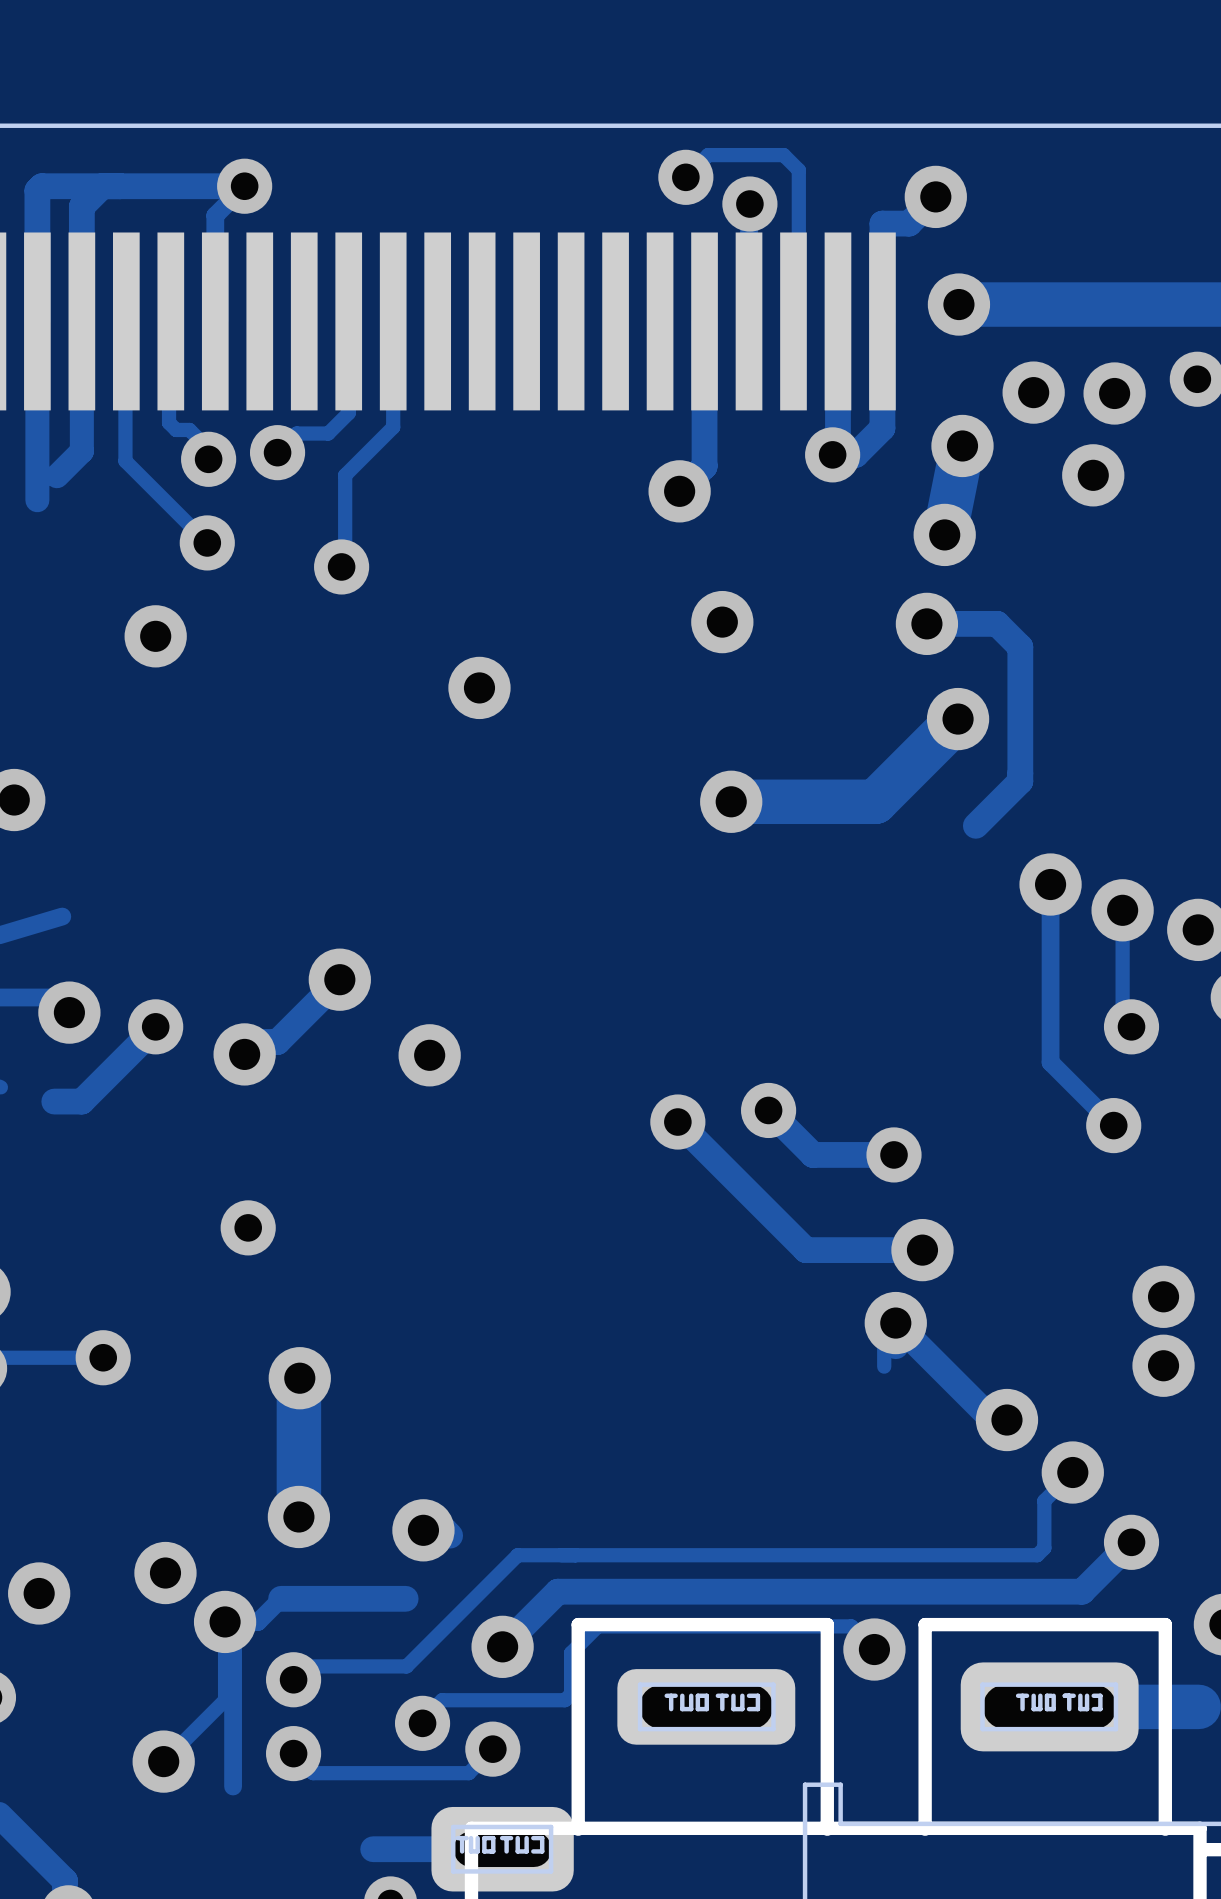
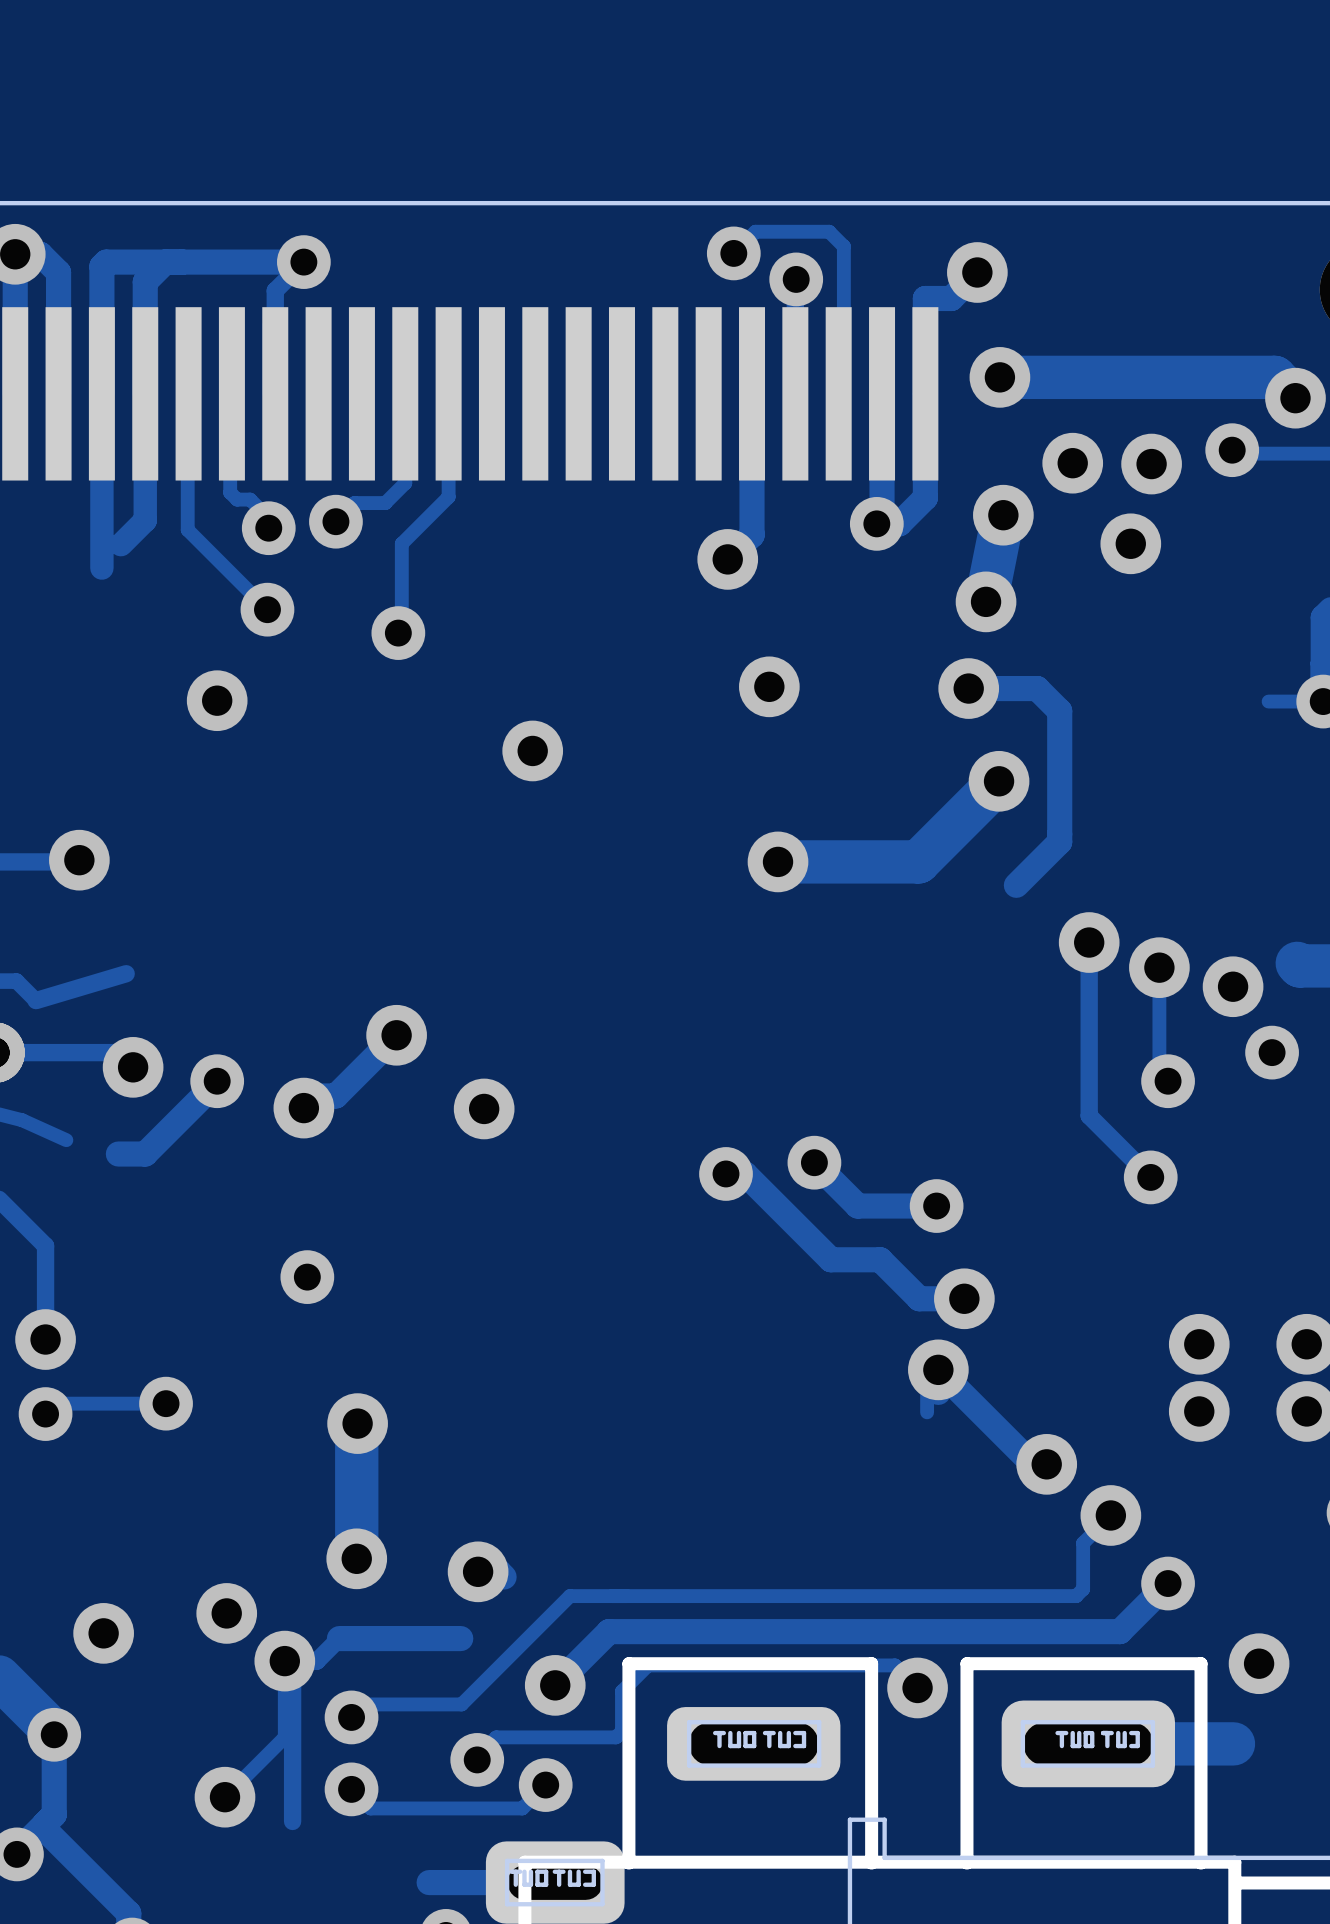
track: (677, 1122) (805, 1250) (876, 1250) -> (726, 1173) (745, 1173) (830, 1259) (880, 1259) (919, 1298)

